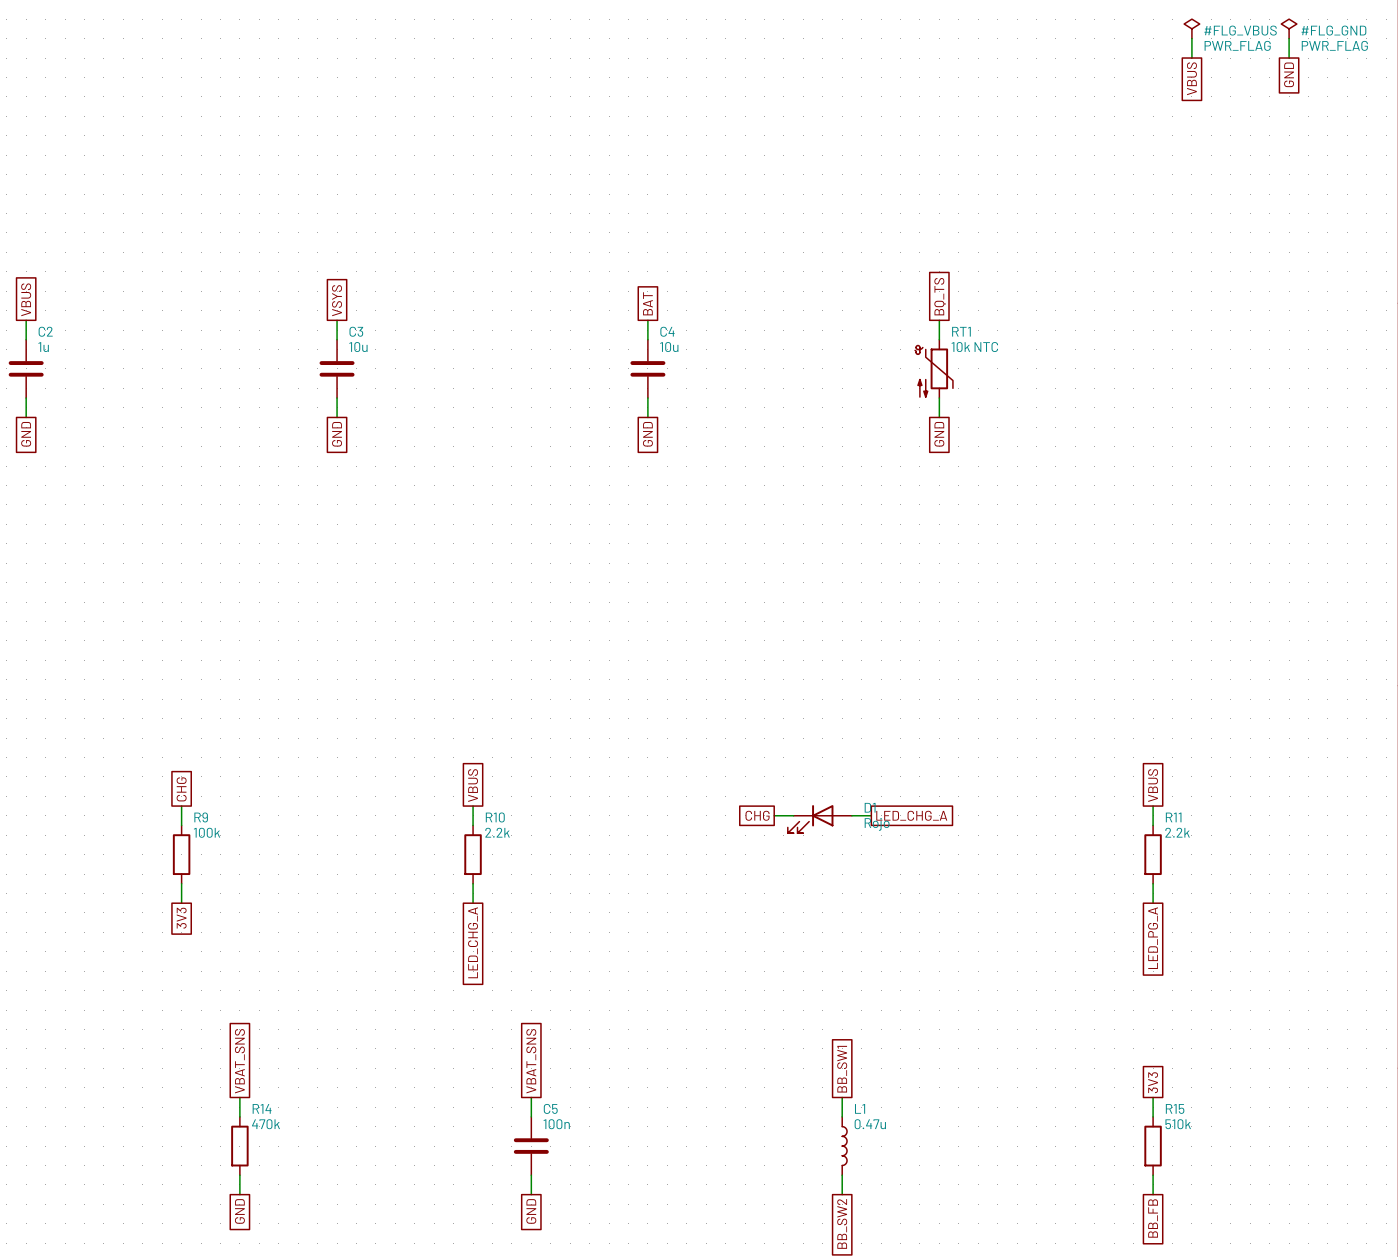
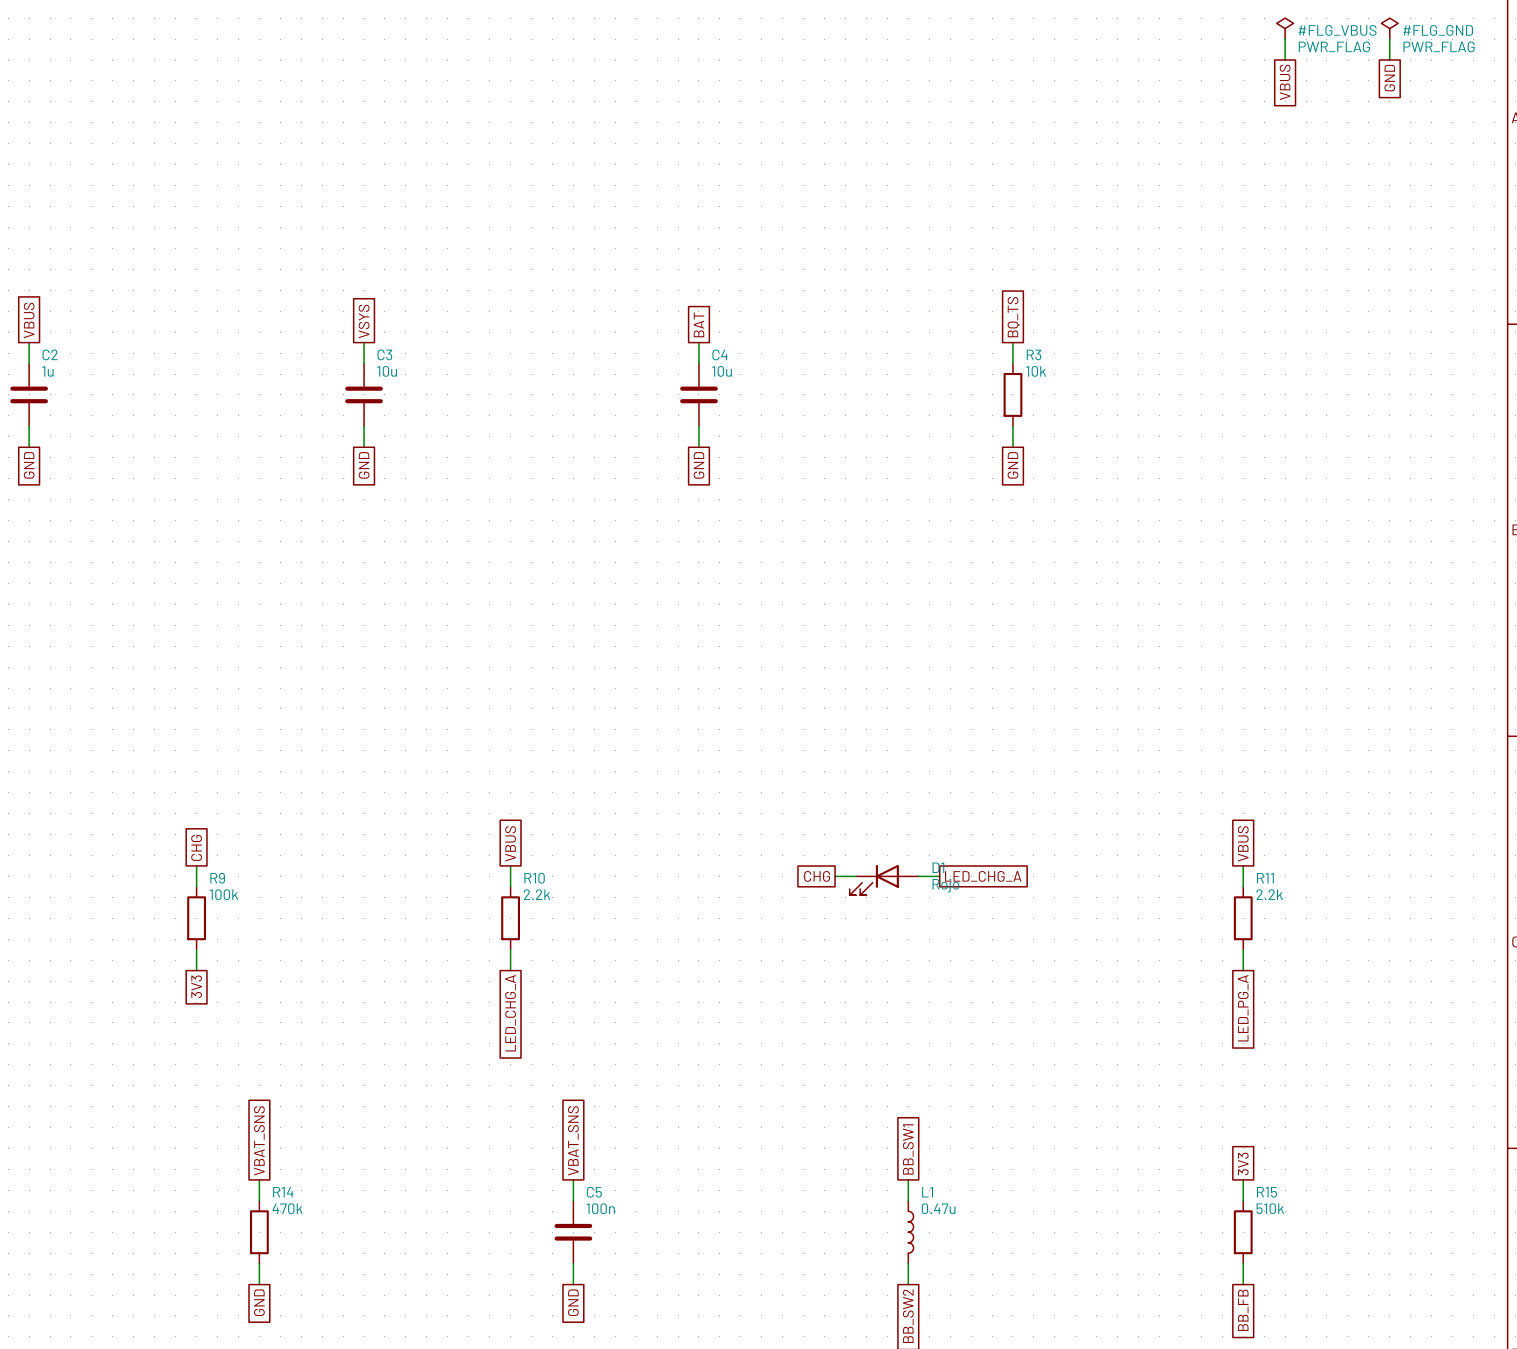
RT1: 10k NTC (934, 368) -> none
R3: none -> 10k (1012, 394)

